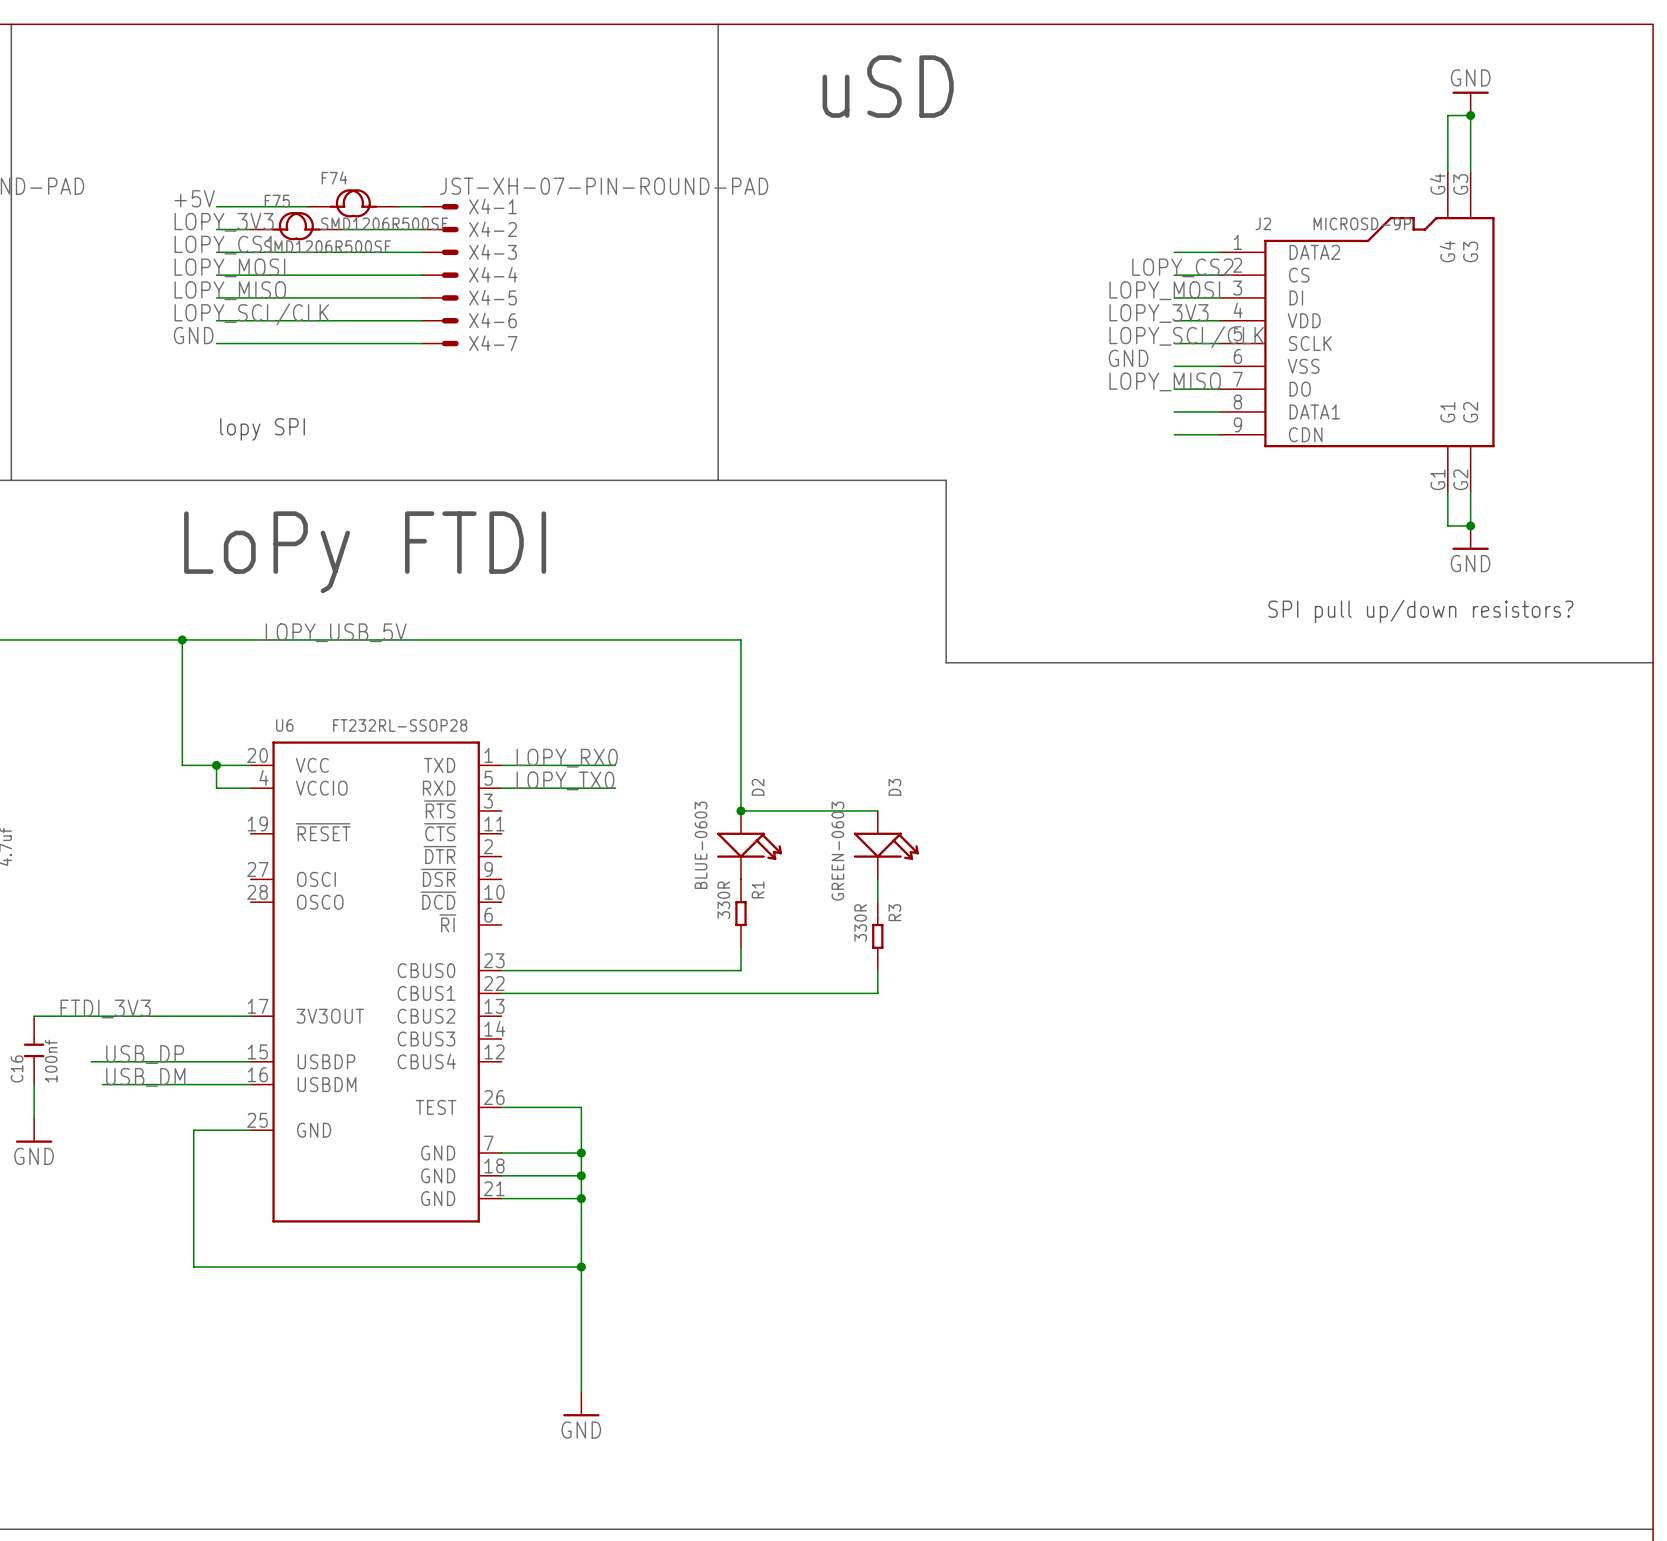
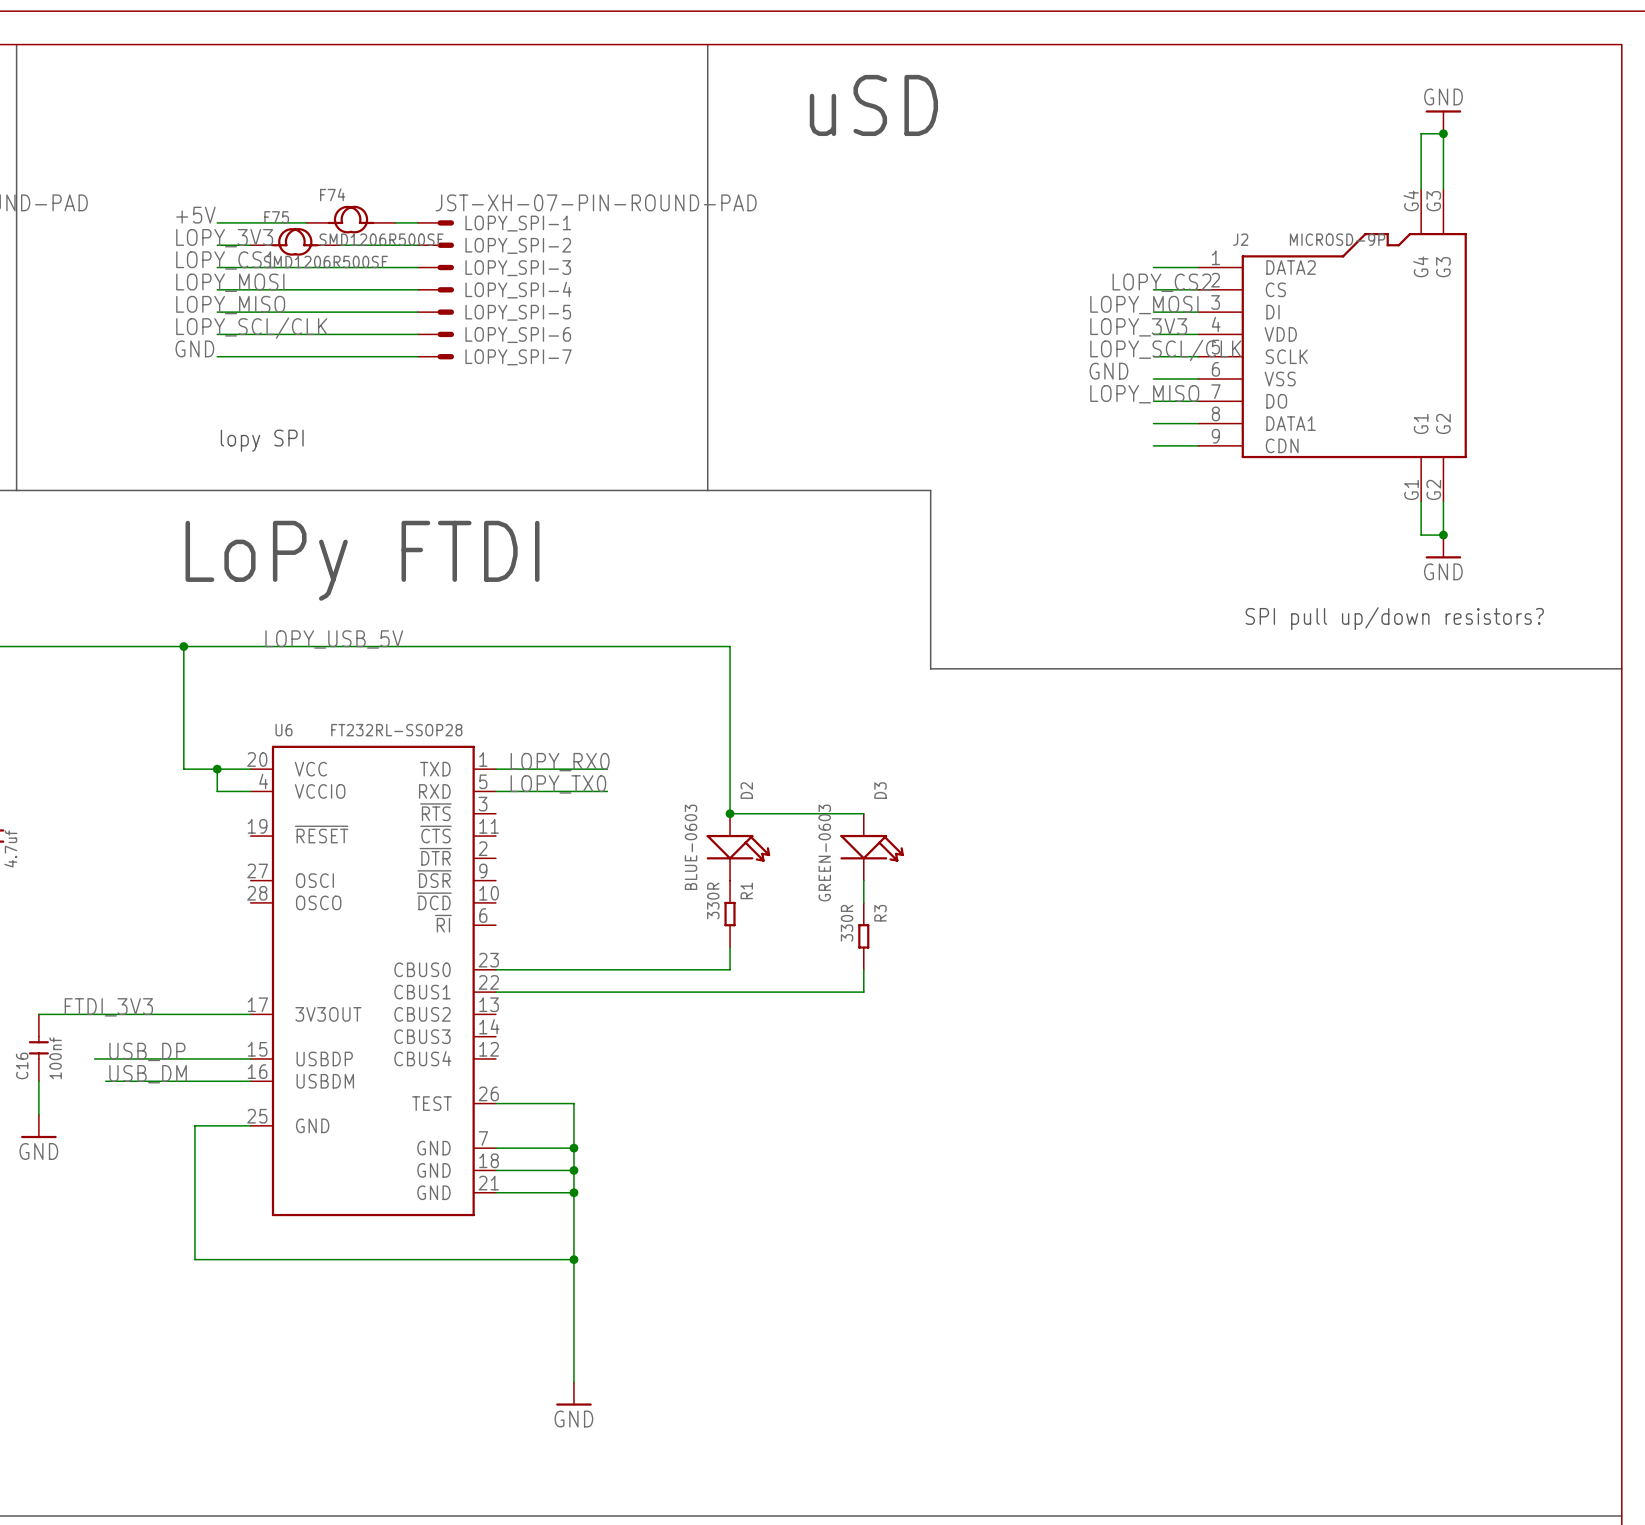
X4-1 name: X4-1 (493, 206) -> LOPY_SPI-1 (518, 223)
X4-2 name: X4-2 (493, 229) -> LOPY_SPI-2 (518, 245)
X4-3 name: X4-3 (493, 252) -> LOPY_SPI-3 (518, 268)
X4-4 name: X4-4 (493, 274) -> LOPY_SPI-4 (518, 290)
X4-5 name: X4-5 (493, 297) -> LOPY_SPI-5 (518, 312)
X4-6 name: X4-6 (493, 320) -> LOPY_SPI-6 (518, 335)
X4-7 name: X4-7 (493, 343) -> LOPY_SPI-7 (518, 357)

